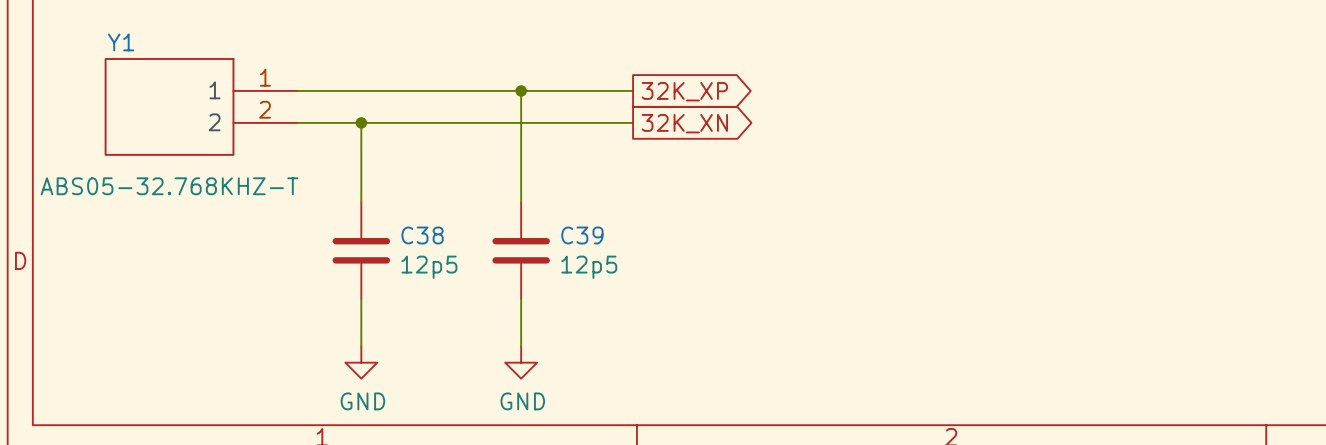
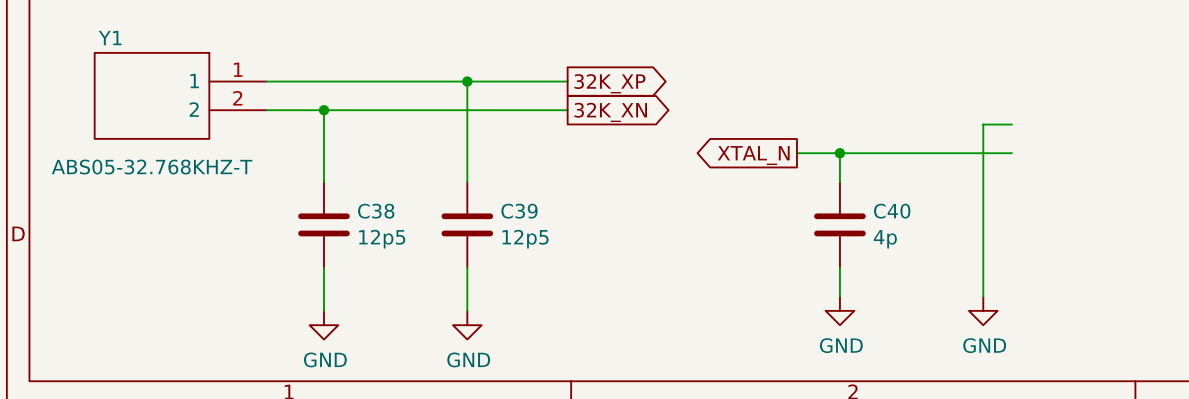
wire: none -> (1011, 124) (983, 124) (983, 296)
wire: none -> (796, 153) (1011, 153)
wire: none -> (839, 153) (839, 181)
junction: none -> (839, 153)
global label: none -> XTAL_N (753, 155)
C40: none -> 4p (839, 224)
wire: none -> (839, 267) (839, 296)
power symbol: none -> GND (839, 310)
power symbol: none -> GND (983, 310)

